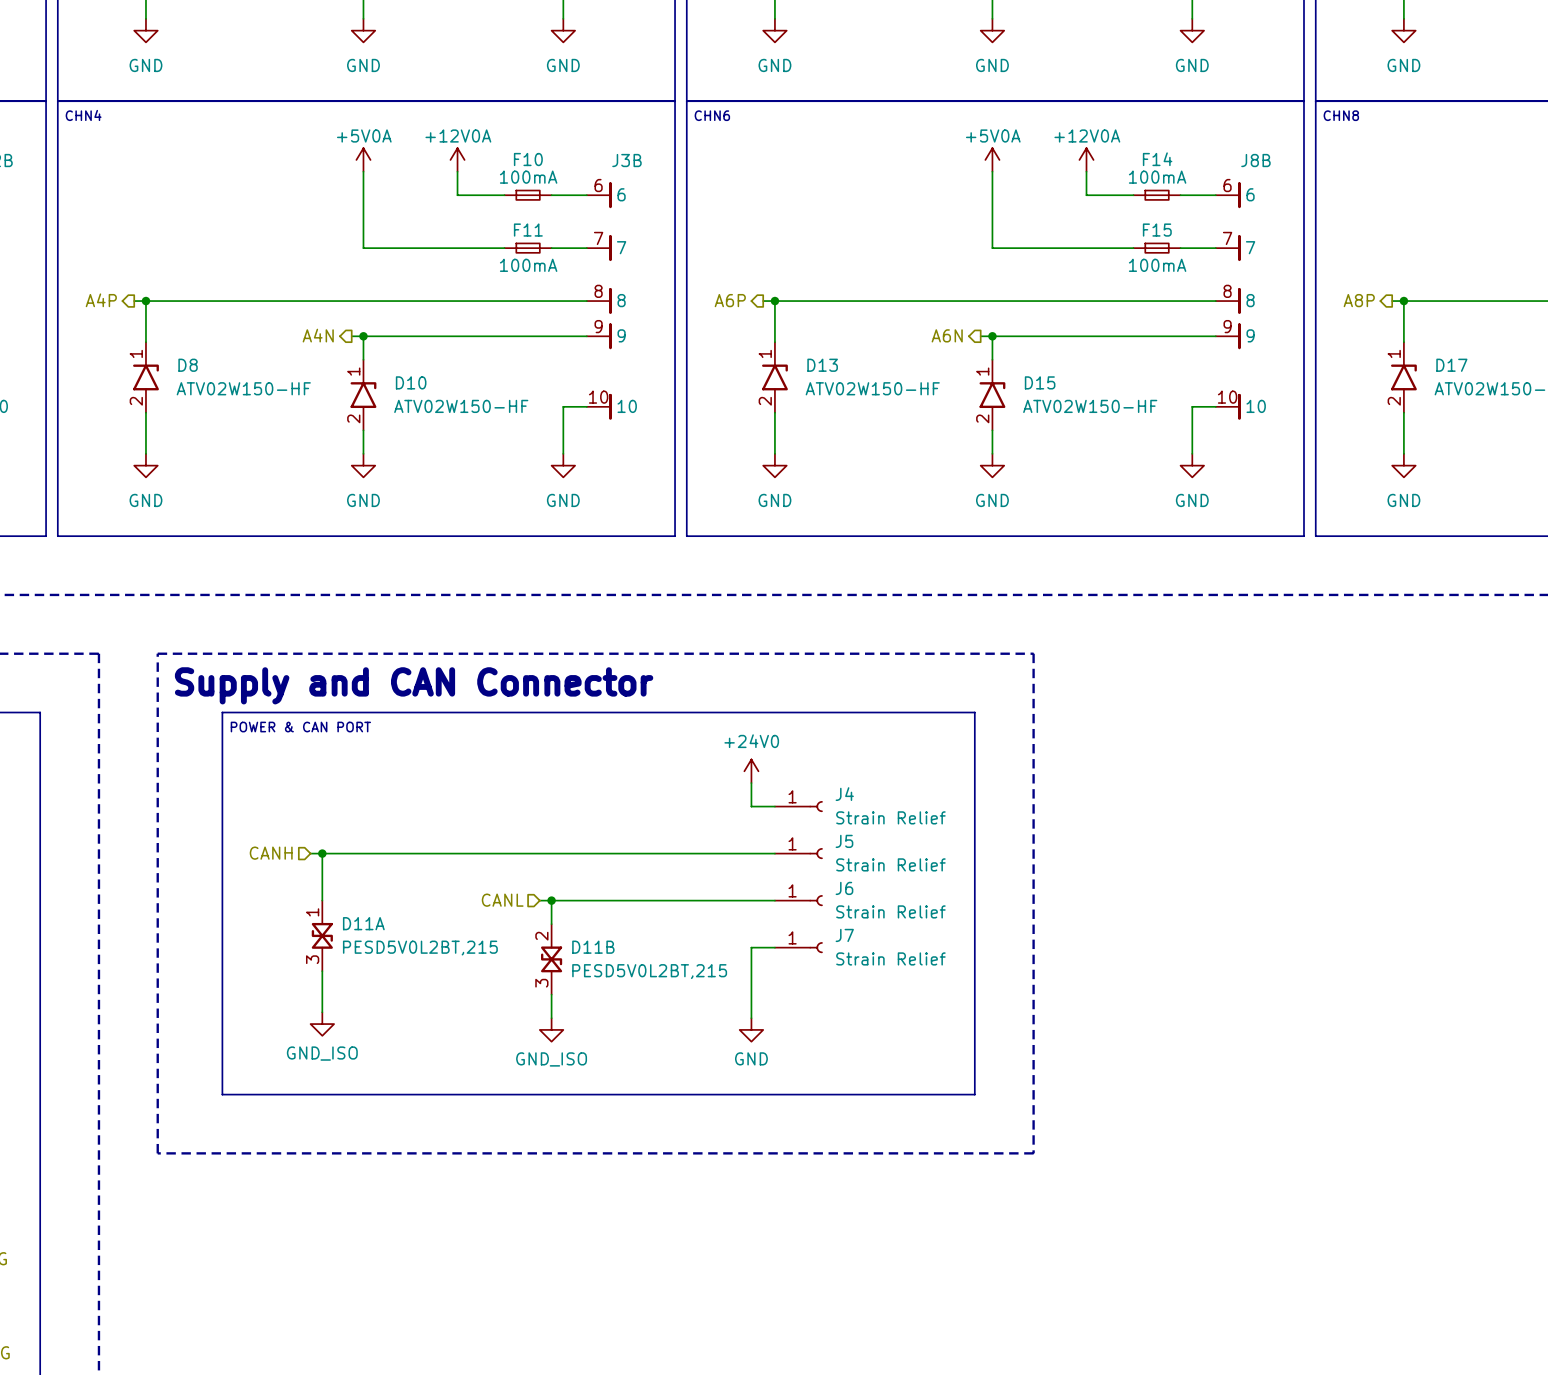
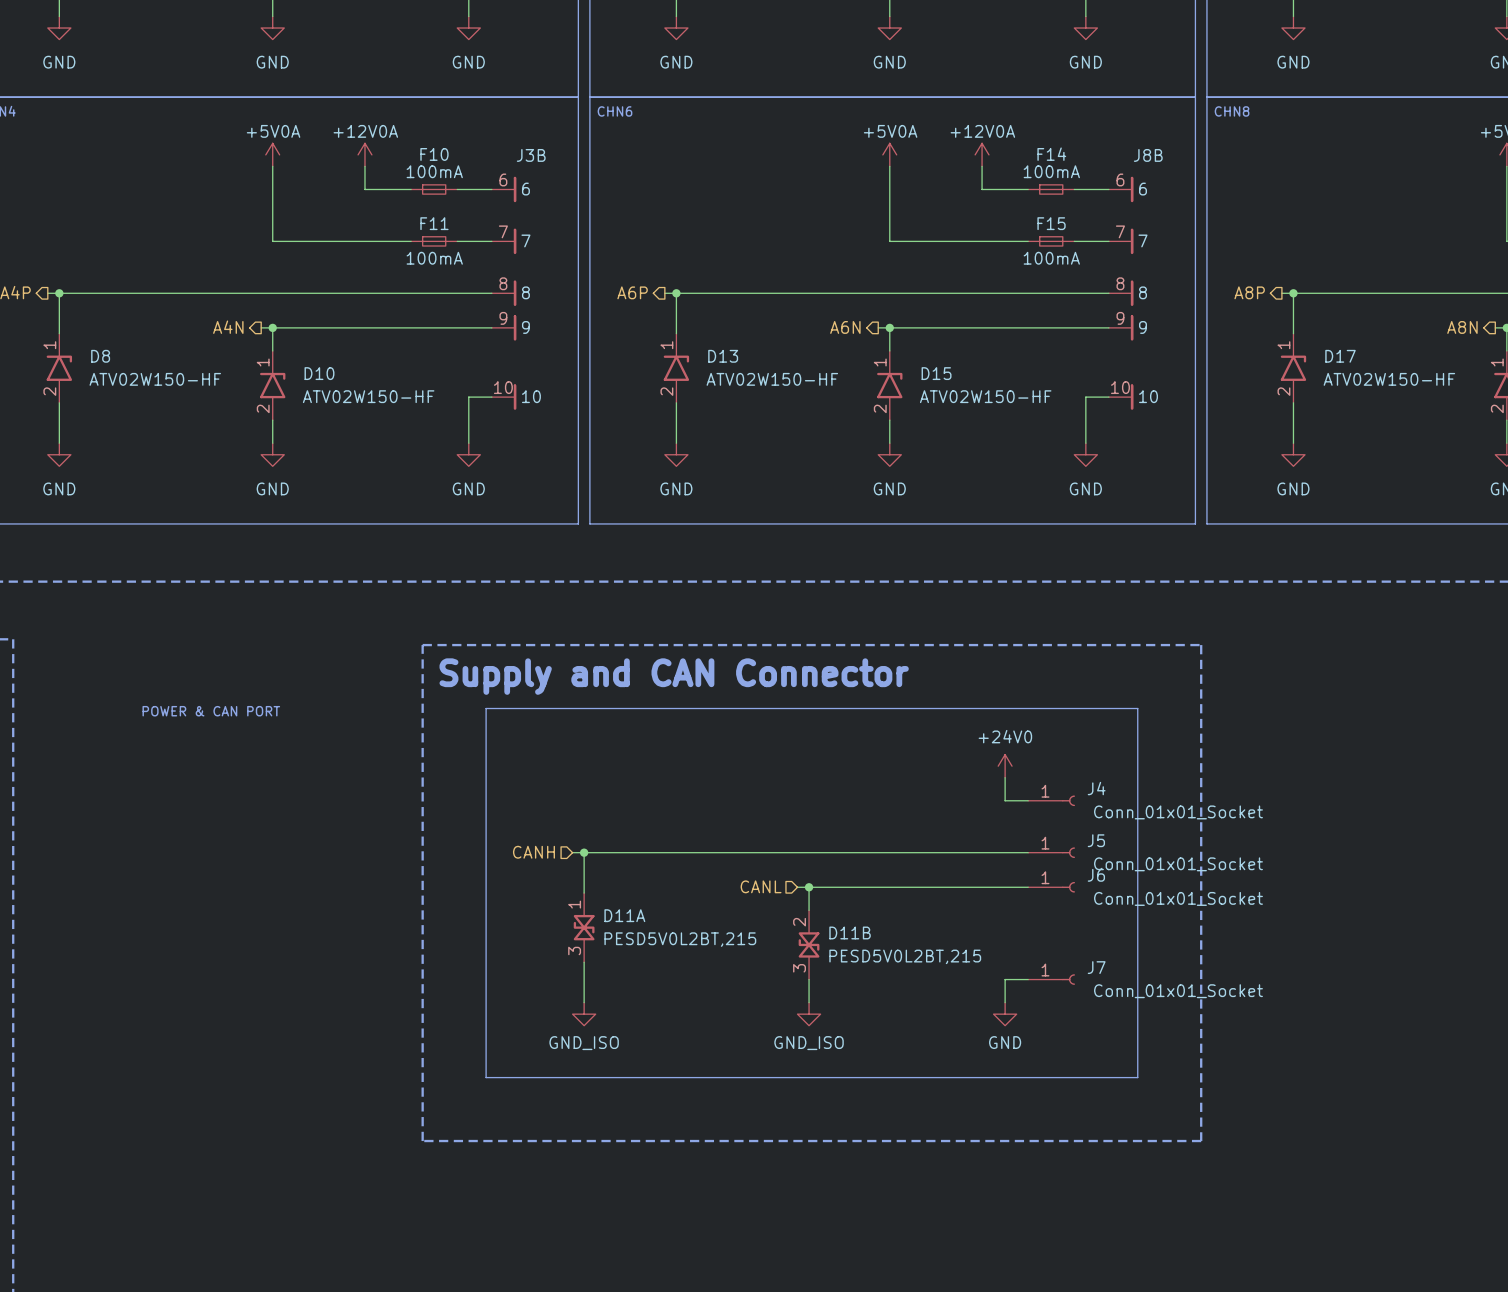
line: (157, 653) (1033, 653) (1033, 1153) (157, 1153) (157, 653) -> none
line: none -> (422, 645) (1201, 645) (1201, 1141) (422, 1141) (422, 645)
text: Supply and CAN Connector (414, 685) -> none
text: none -> Supply and CAN Connector (674, 676)
line: (222, 712) (974, 712) (974, 1094) (222, 1094) (222, 712) -> none
line: none -> (486, 708) (1137, 708) (1137, 1077) (486, 1077) (486, 708)
power symbol: +24V0 (751, 771) -> none
wire: (751, 783) (751, 806) (774, 806) -> none
power symbol: none -> +24V0 (1005, 766)
wire: none -> (1005, 777) (1005, 800) (1028, 800)
J4 position: (798, 806) -> (1051, 800)
J4 value: Strain Relief (890, 817) -> Conn_01x01_Socket (1178, 812)
hierarchical label: CANH (271, 853) -> none
wire: (310, 853) (774, 853) -> none
wire: (322, 853) (322, 900) -> none
junction: (322, 853) -> none
J5 position: (798, 853) -> (1051, 852)
J5 value: Strain Relief (890, 864) -> Conn_01x01_Socket (1178, 864)
hierarchical label: none -> CANH (533, 852)
wire: none -> (572, 852) (1028, 852)
wire: none -> (584, 852) (584, 893)
junction: none -> (584, 852)
hierarchical label: CANL (502, 900) -> none
wire: (539, 900) (774, 900) -> none
wire: (551, 900) (551, 924) -> none
junction: (551, 900) -> none
J6 position: (798, 900) -> (1051, 887)
hierarchical label: none -> CANL (761, 886)
wire: none -> (797, 887) (1028, 887)
wire: none -> (809, 887) (809, 910)
junction: none -> (809, 887)
J6 value: Strain Relief (890, 911) -> Conn_01x01_Socket (1178, 898)
D11A position: (322, 935) -> (584, 927)
wire: (774, 947) (751, 947) (751, 1018) -> none
J7 position: (798, 947) -> (1051, 979)
J7 value: Strain Relief (890, 958) -> Conn_01x01_Socket (1178, 991)
D11B position: (551, 959) -> (809, 944)
wire: (322, 971) (322, 1012) -> none
wire: none -> (584, 962) (584, 1002)
wire: (551, 994) (551, 1018) -> none
wire: none -> (809, 979) (809, 1002)
wire: none -> (1028, 979) (1005, 979) (1005, 1002)
power symbol: GND_ISO (322, 1024) -> none
power symbol position: GND_ISO (551, 1029) -> GND_ISO (584, 1014)
power symbol: GND (751, 1029) -> none
power symbol: none -> GND_ISO (809, 1014)
power symbol: none -> GND (1005, 1014)

